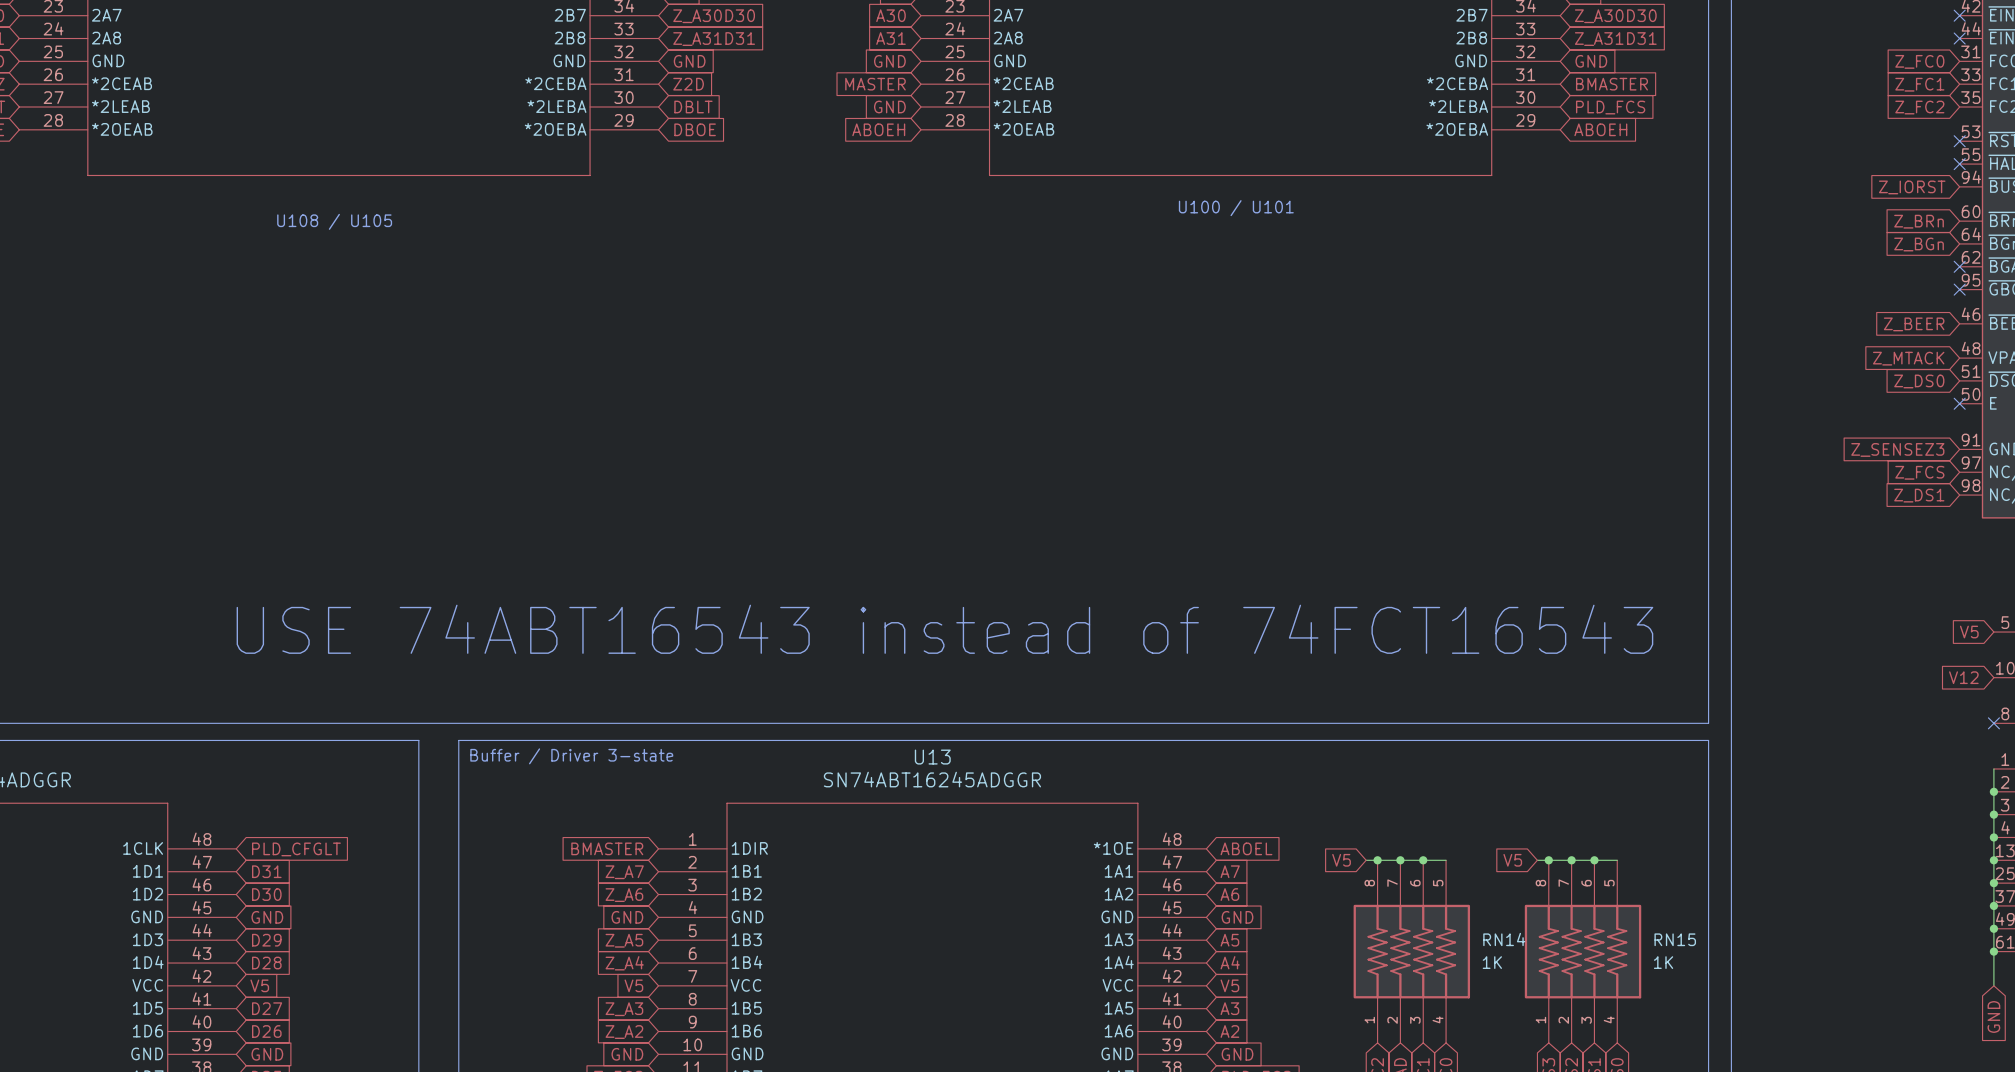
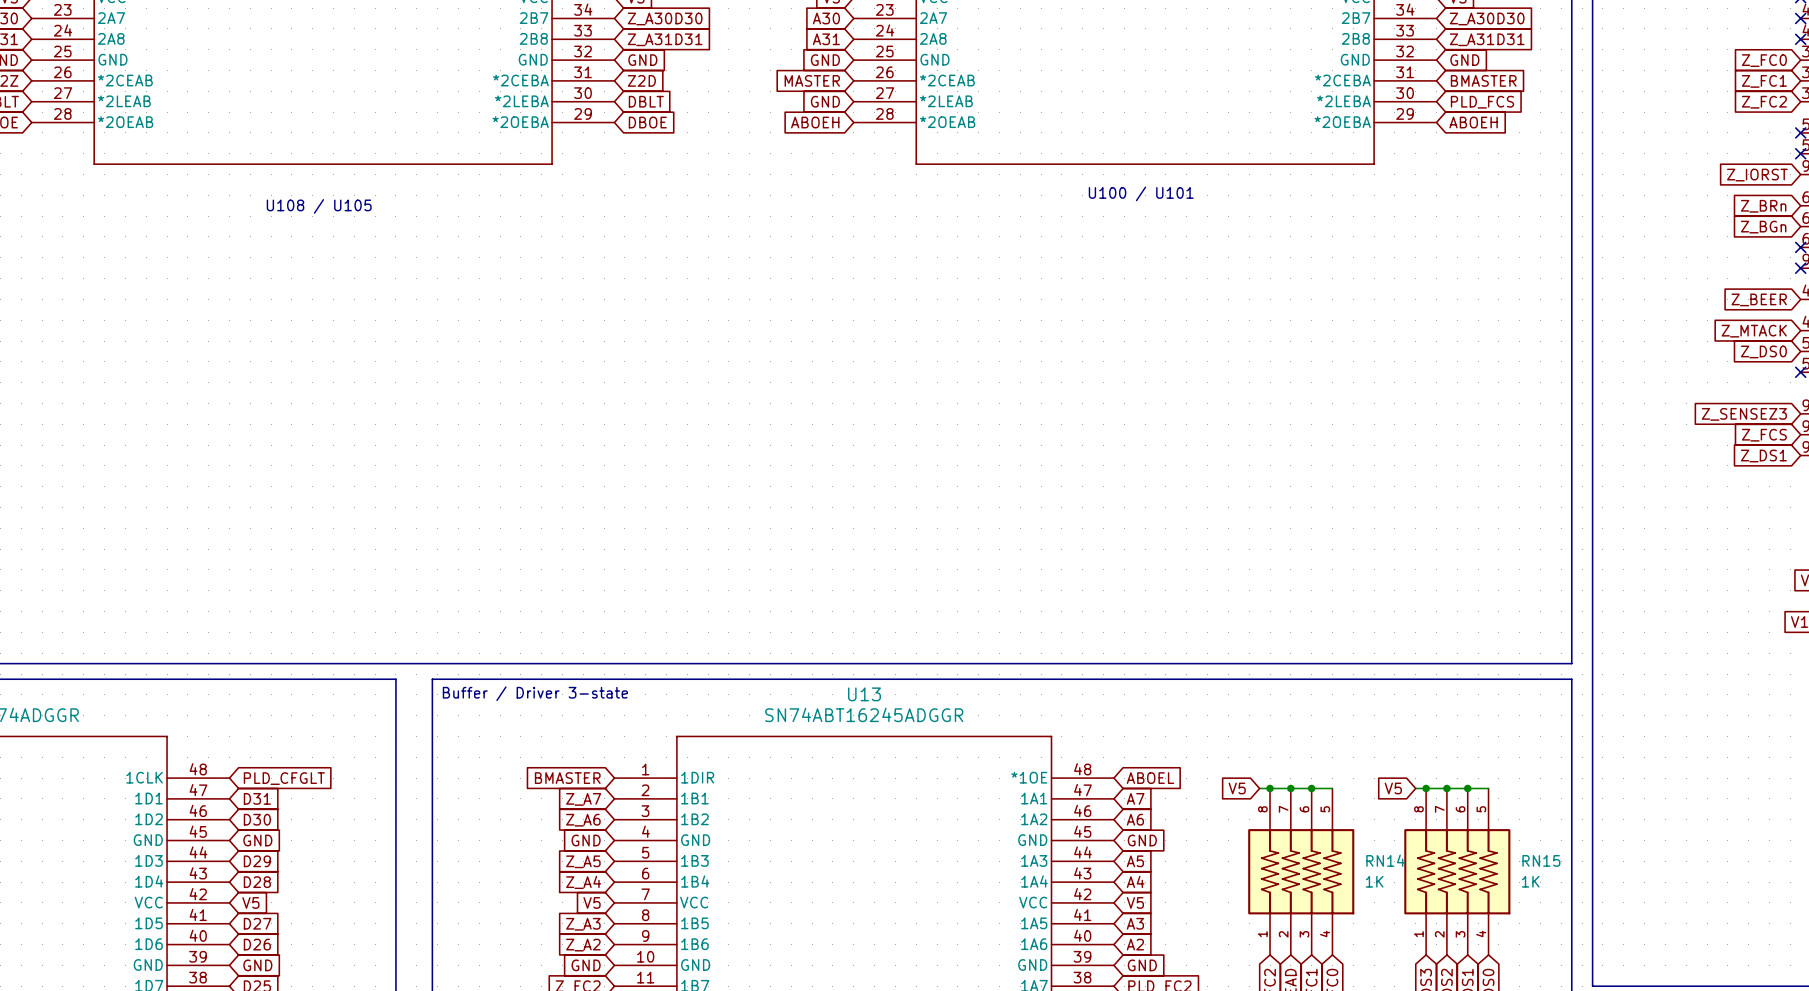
text: USE 74ABT16543 instead of 74FCT16543 (944, 629) -> none

